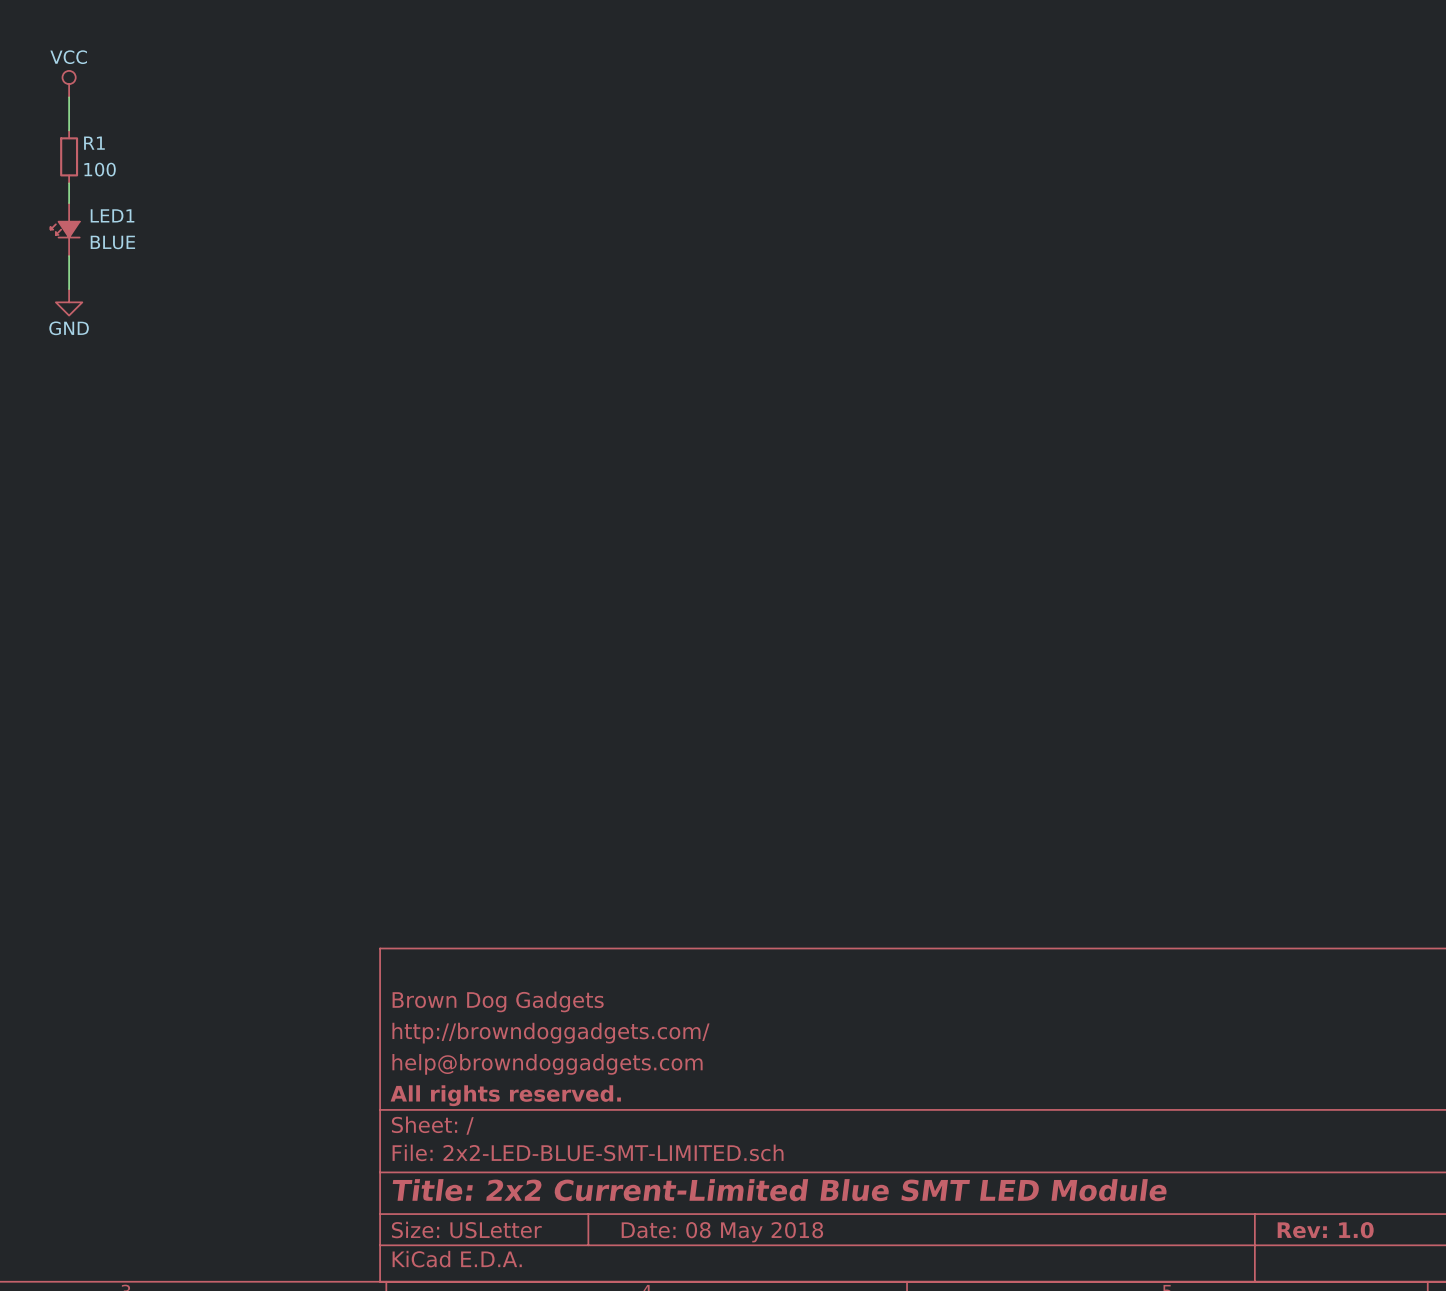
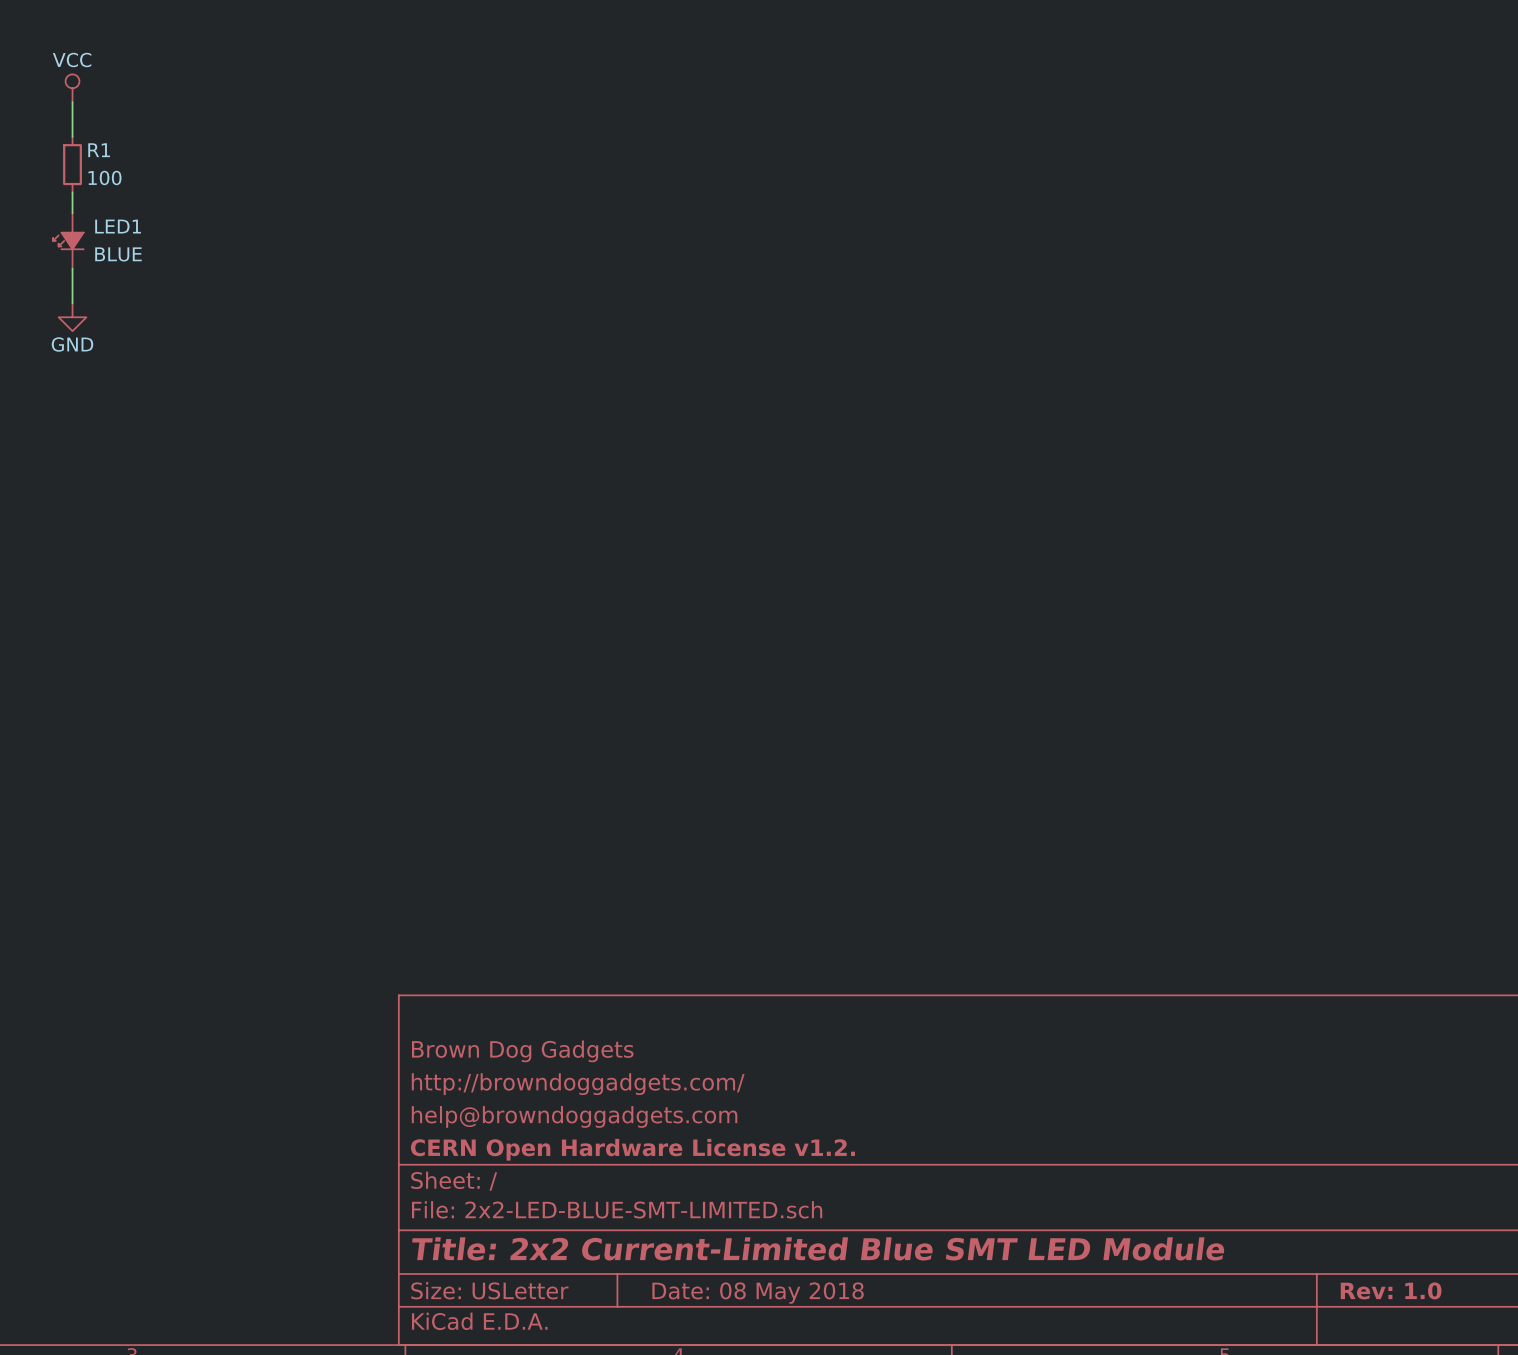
title block: All rights reserved. (505, 1095) -> CERN Open Hardware License v1.2. (632, 1149)

